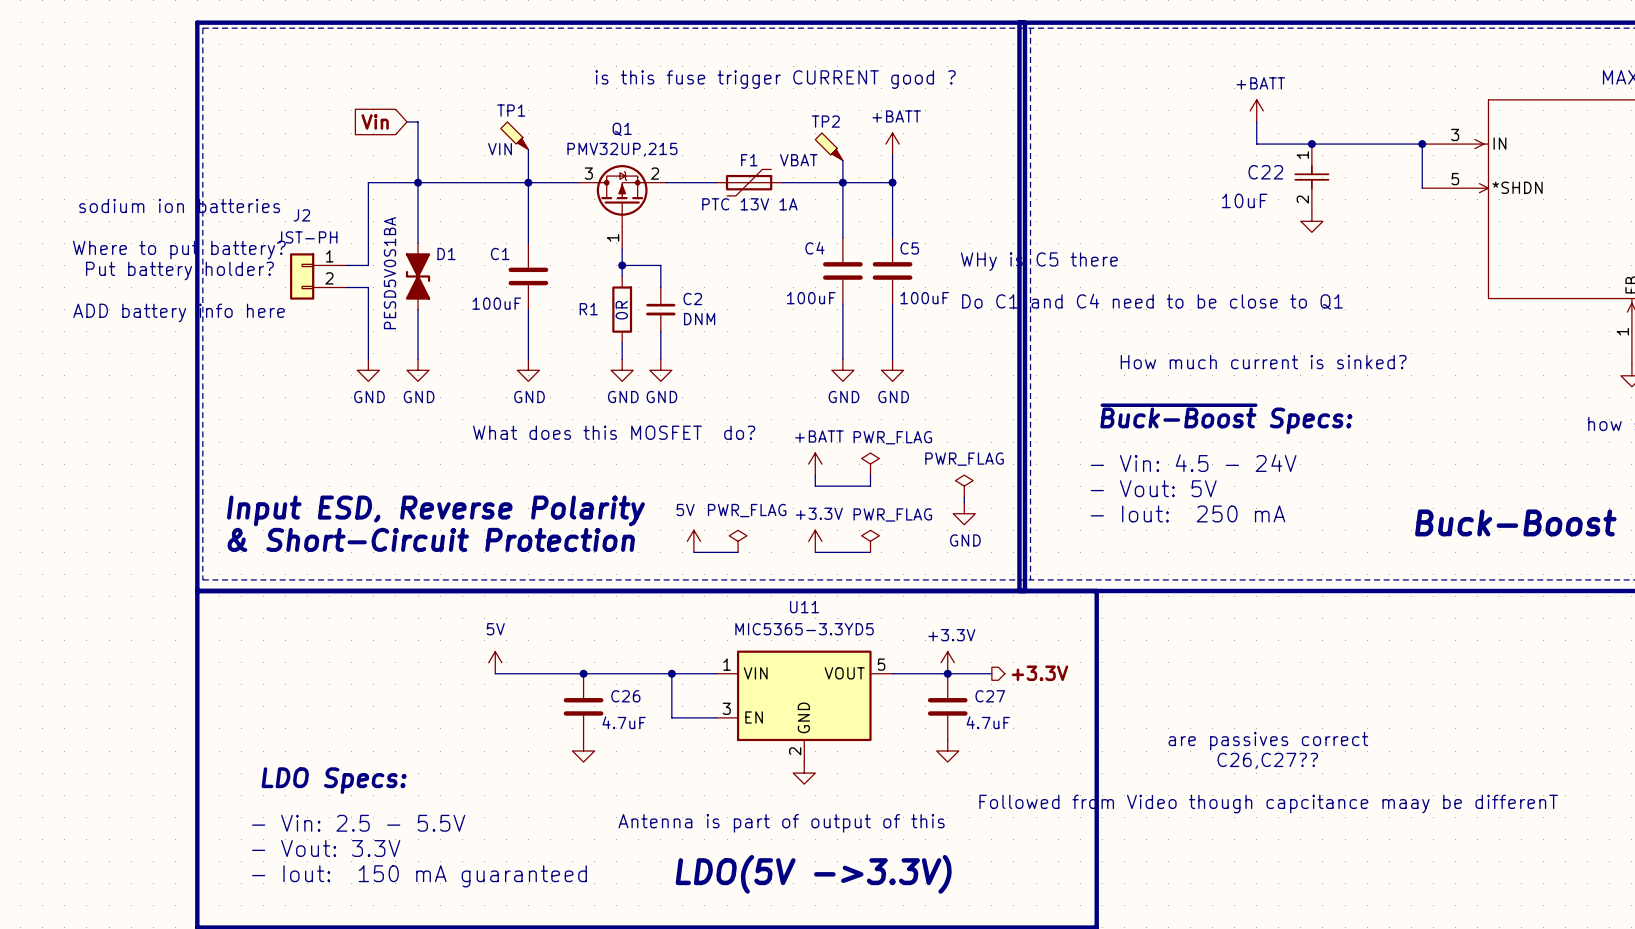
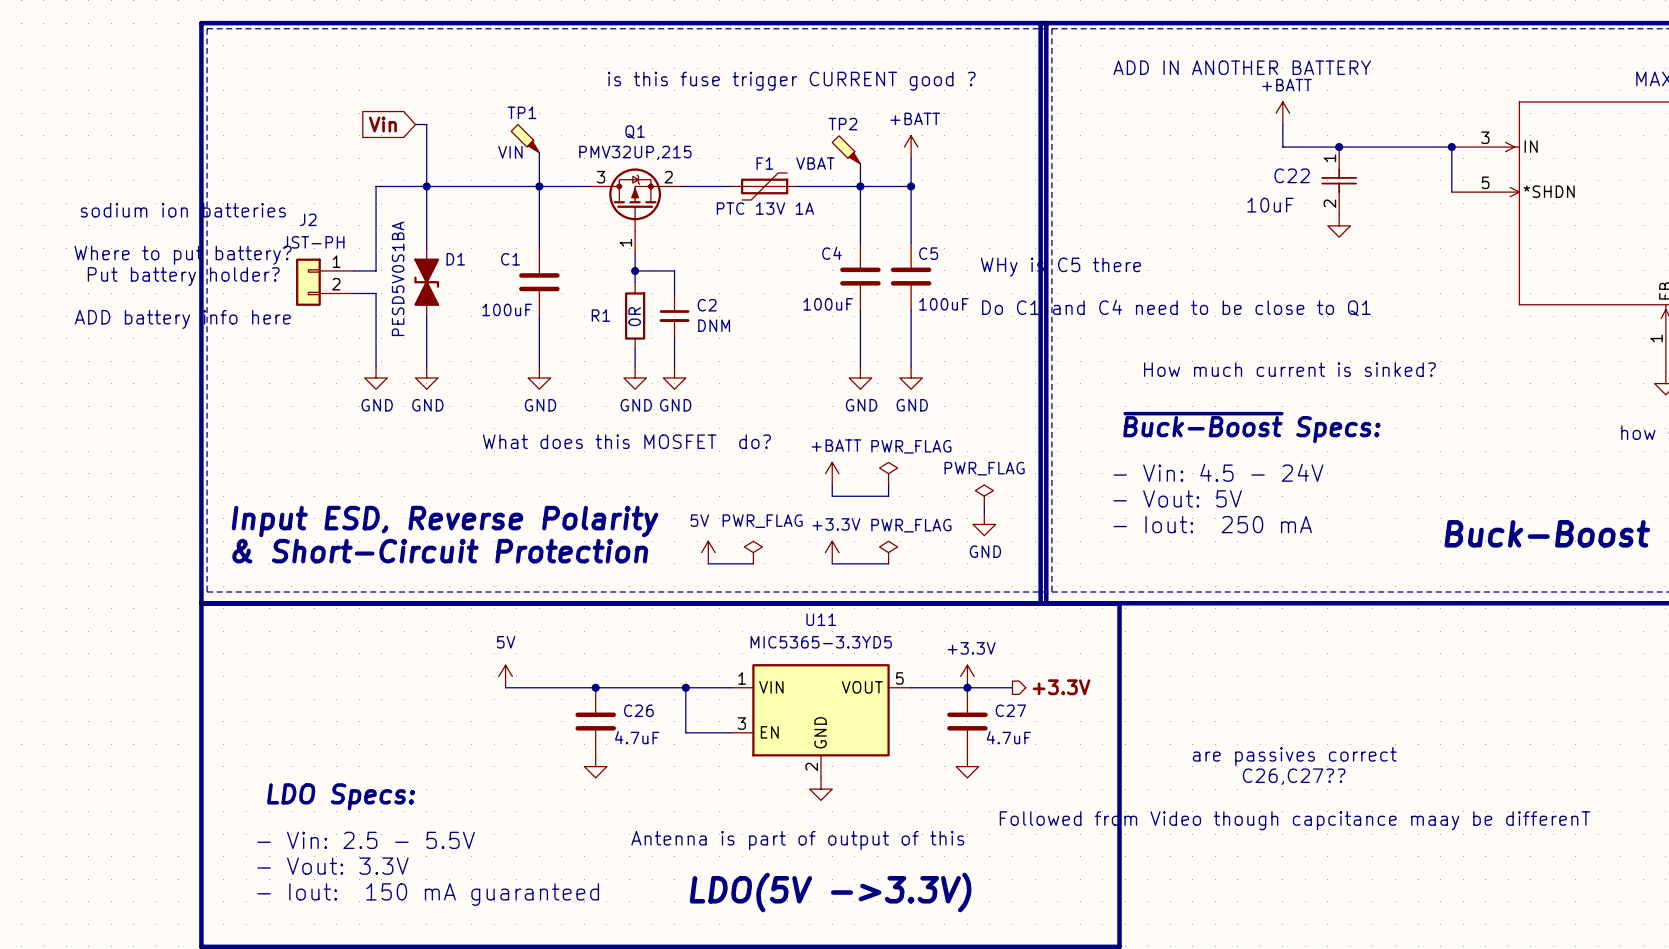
text: none -> ADD IN ANOTHER BATTERY (1242, 67)

